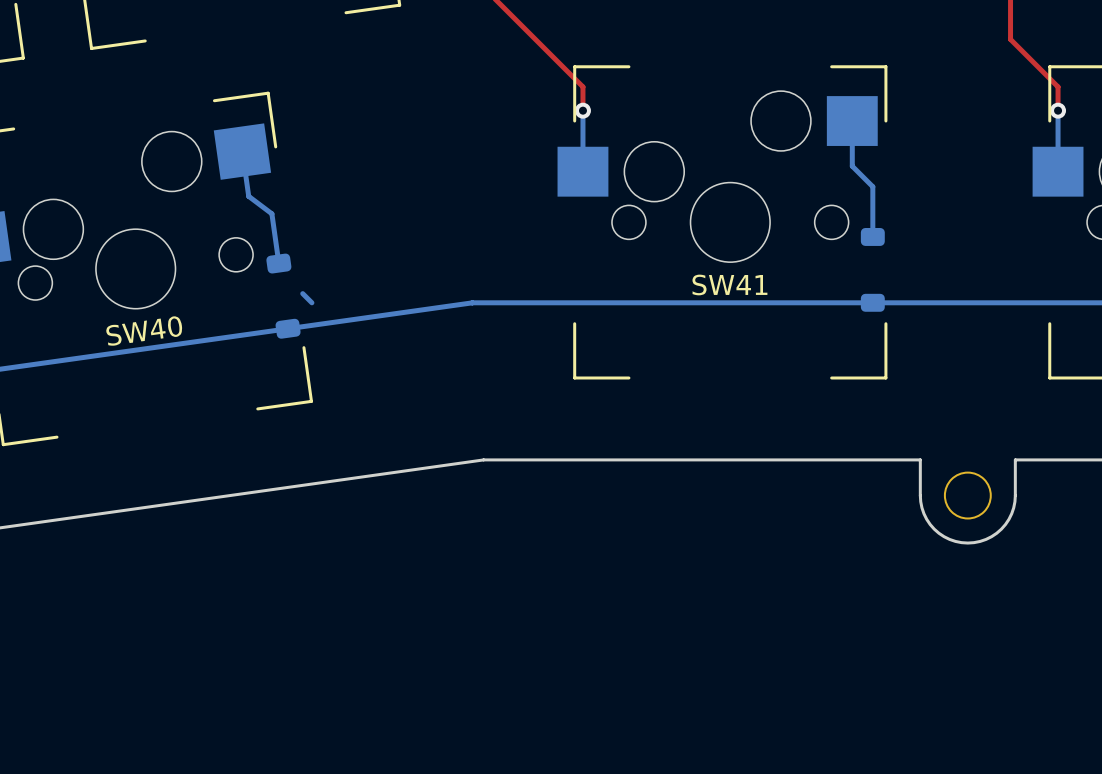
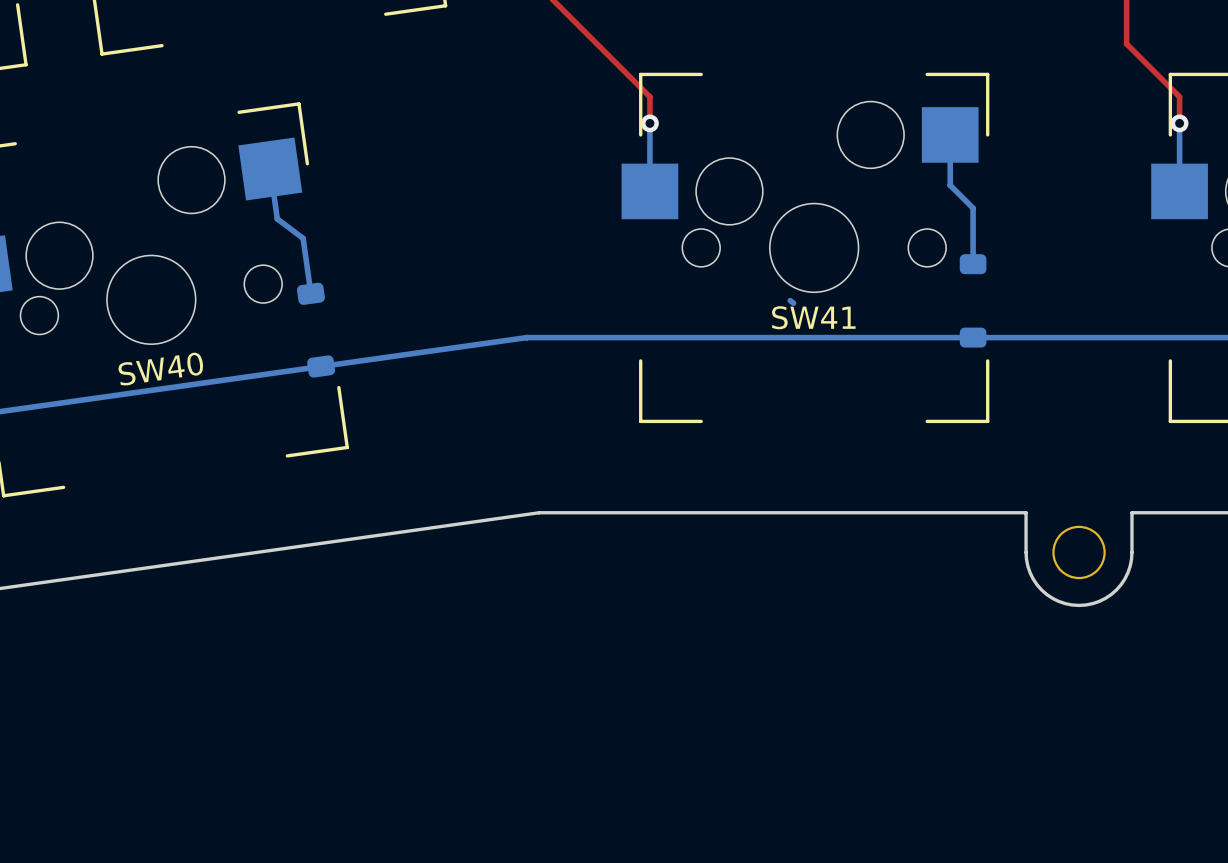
bottom track: none -> (790, 300) (793, 303)
bottom track: (302, 293) (311, 302) -> none

